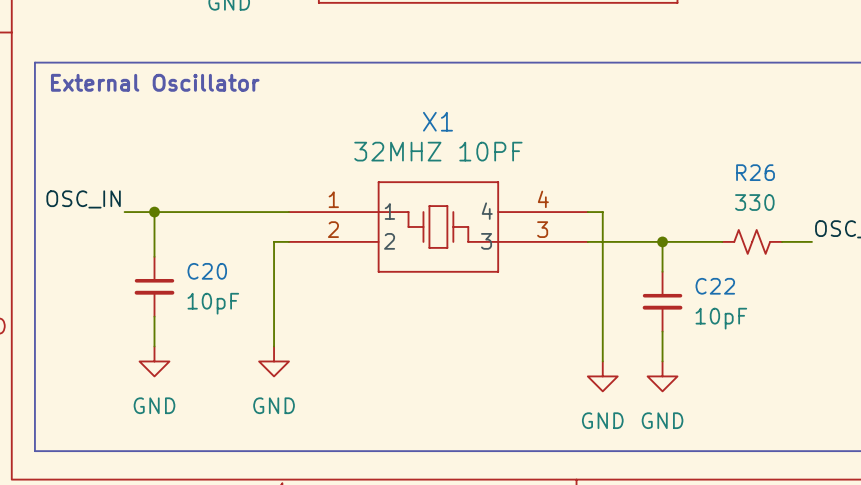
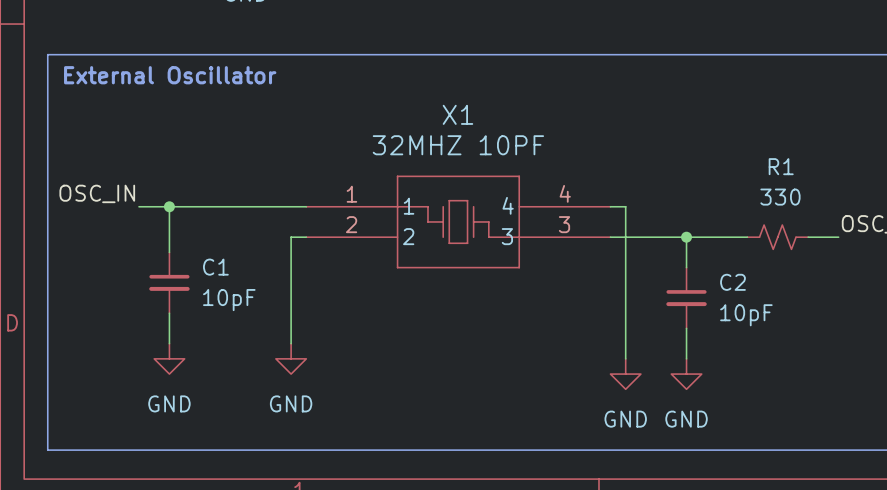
R26 name: R26 (755, 172) -> R1 (781, 166)
C20 name: C20 (207, 271) -> C1 (215, 267)
C22 name: C22 (715, 286) -> C2 (732, 282)

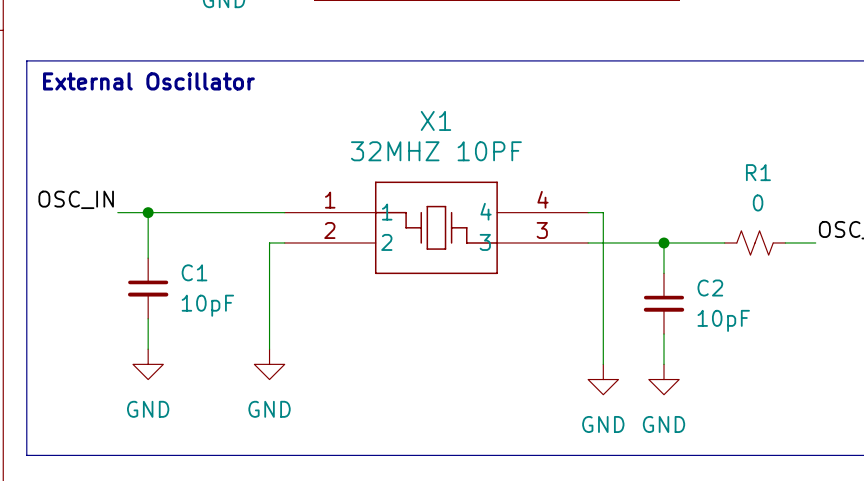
R1 value: 330 (780, 197) -> 0 (758, 202)

